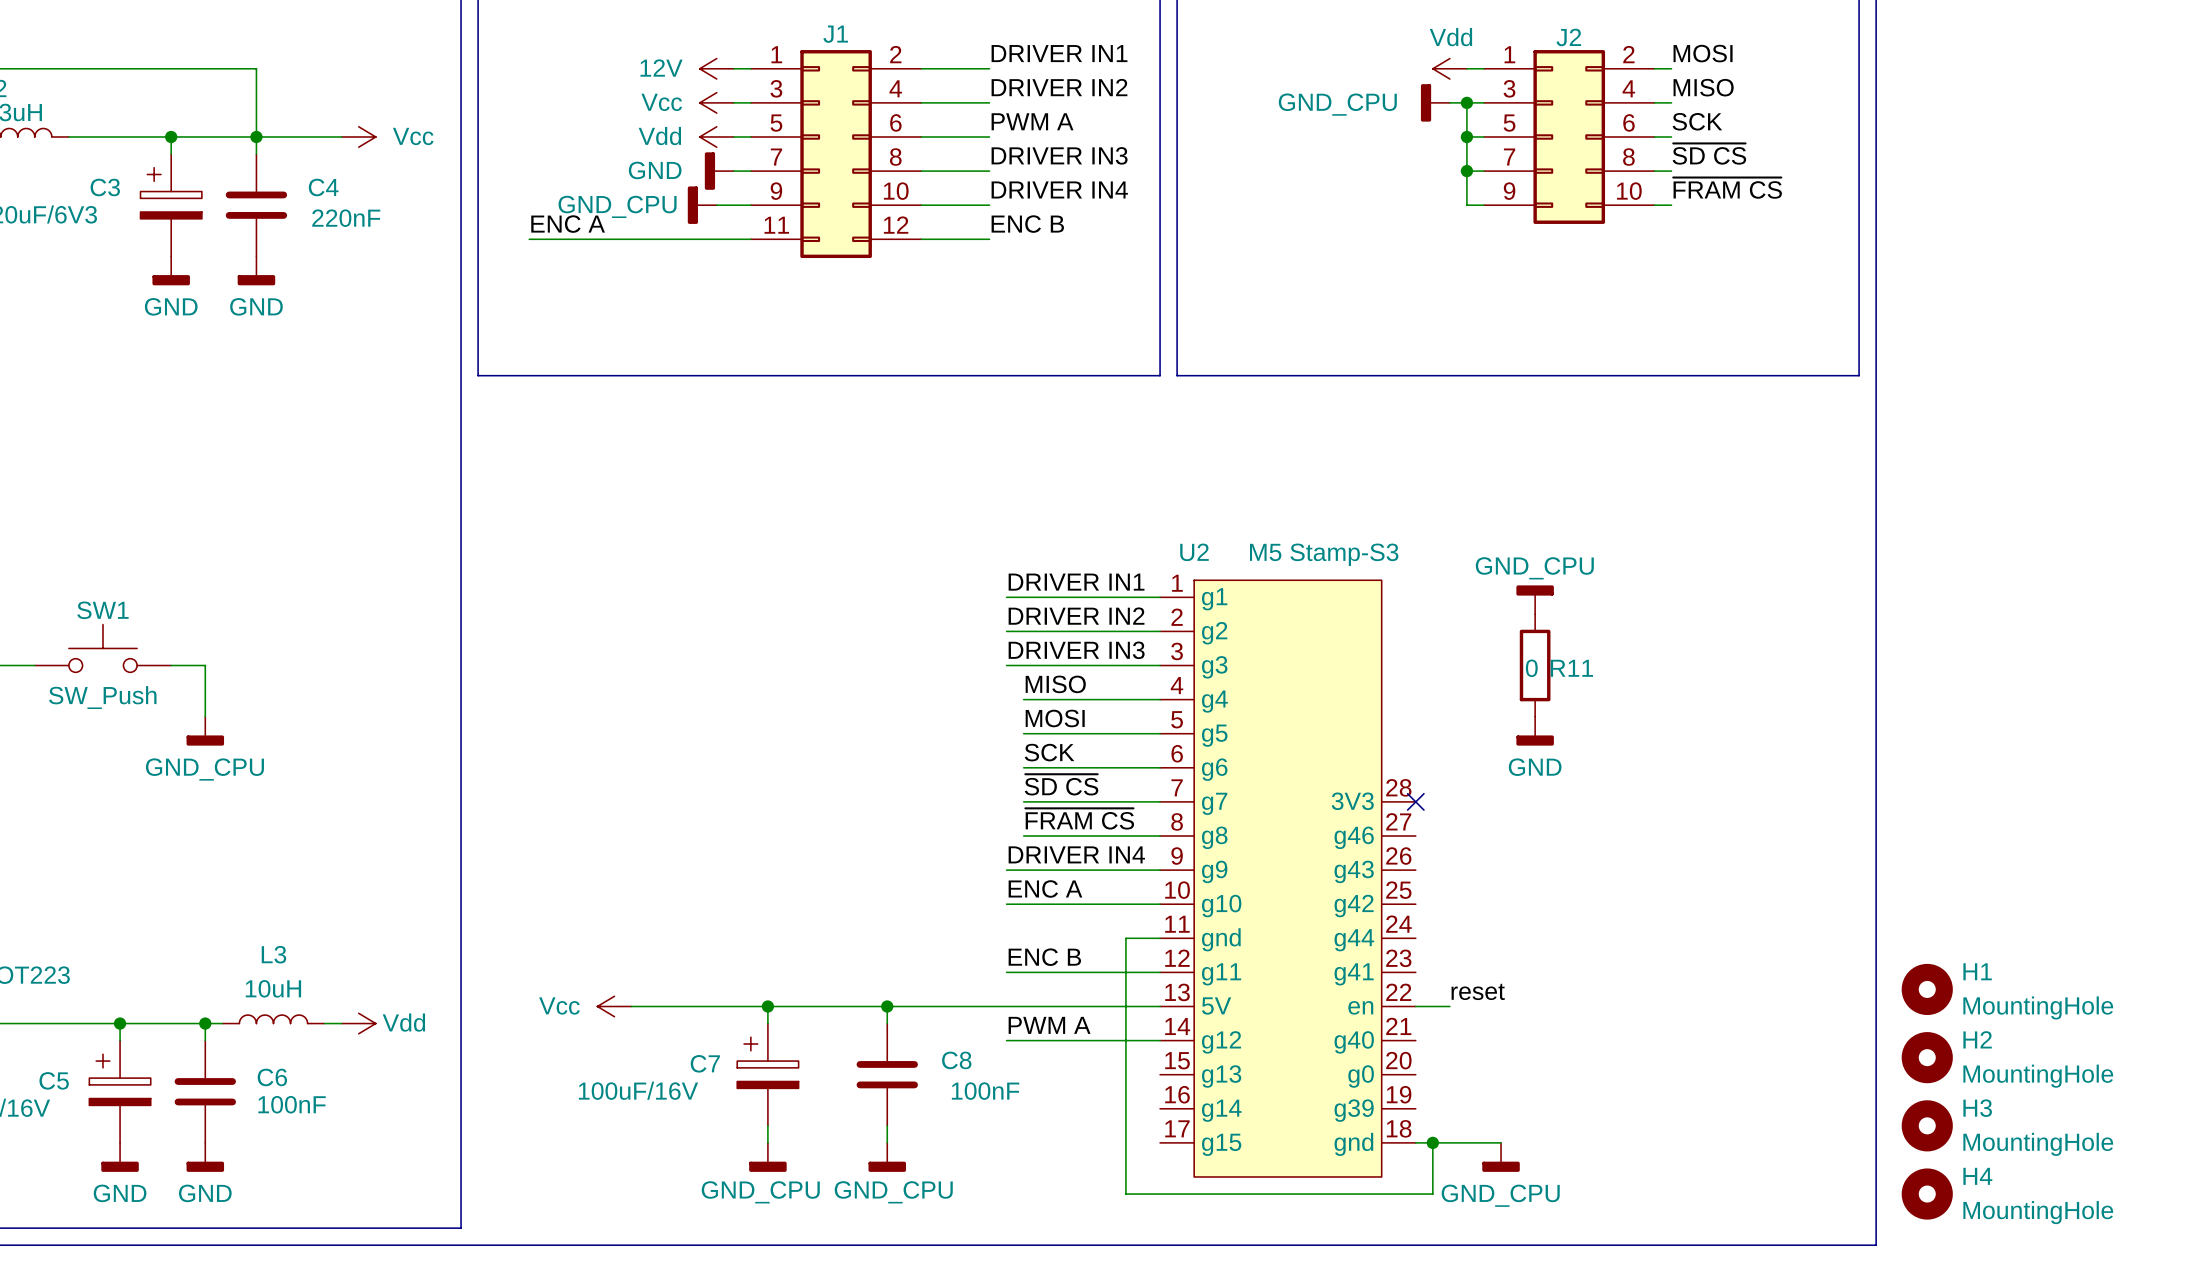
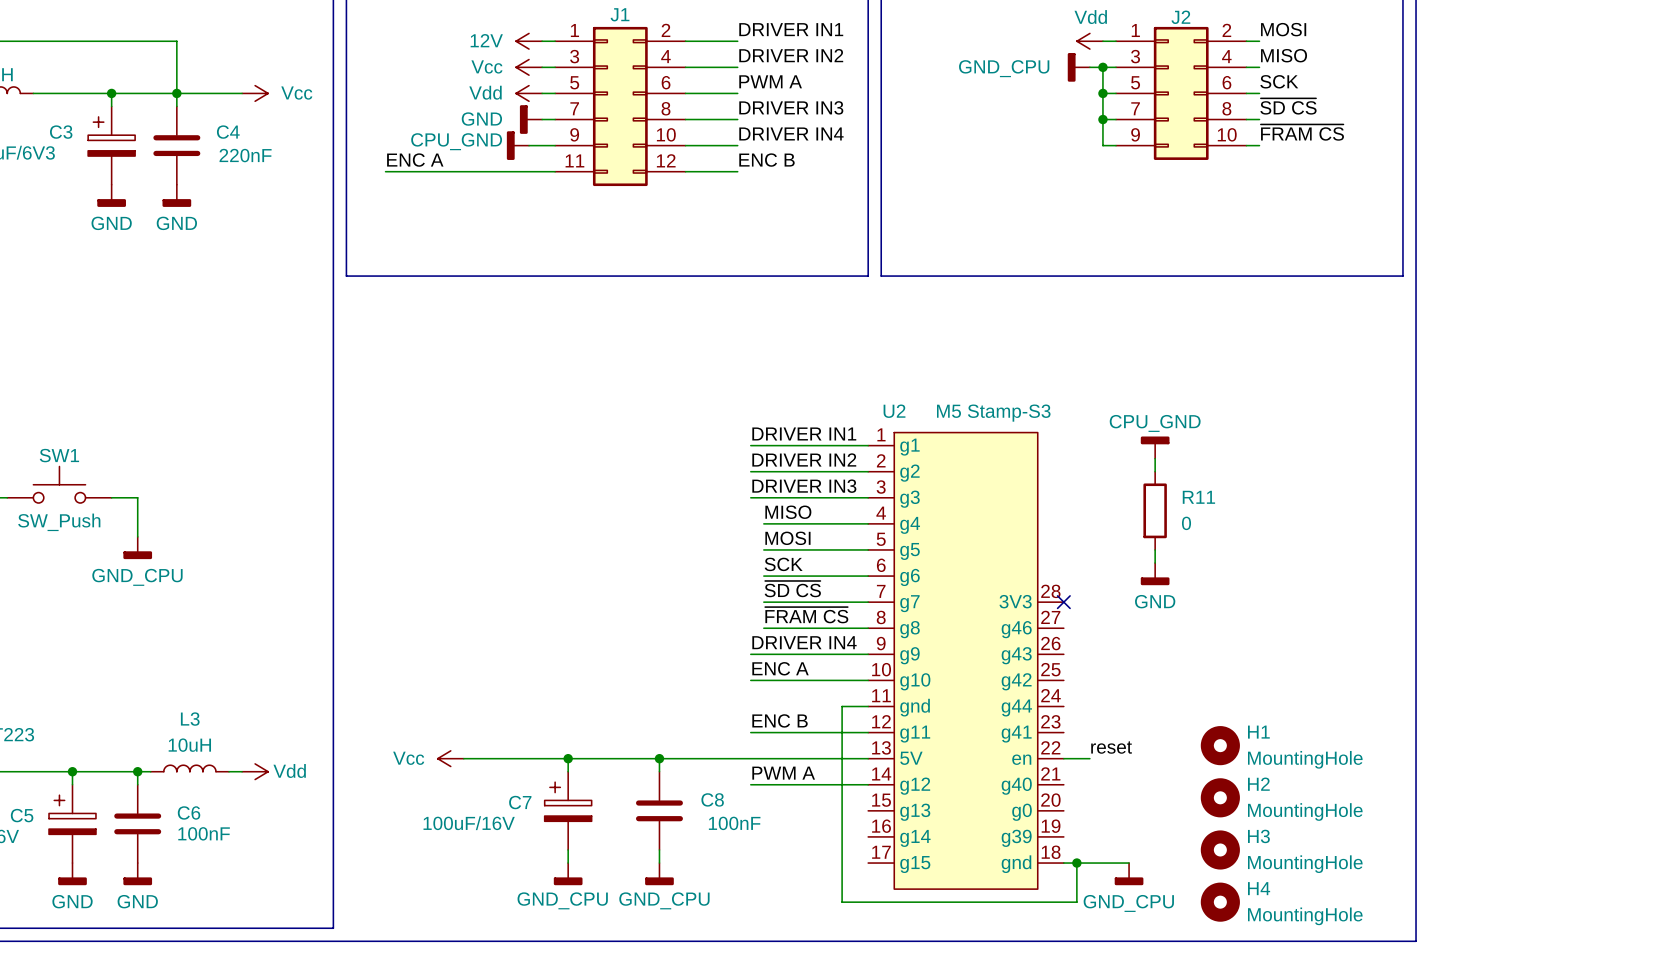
power symbol: GND_CPU (702, 205) -> CPU_GND (517, 145)
power symbol: GND_CPU (1535, 599) -> CPU_GND (1155, 447)
R11 position: (1535, 665) -> (1155, 510)
R11 value position: 0 (1531, 668) -> 0 (1186, 523)
R11 name position: R11 (1571, 668) -> R11 (1198, 497)
power symbol position: GND (1535, 731) -> GND (1155, 574)
H1 position: (1927, 989) -> (1220, 745)
H2 position: (1927, 1057) -> (1220, 797)
H3 position: (1927, 1125) -> (1220, 849)
H4 position: (1927, 1194) -> (1220, 902)

